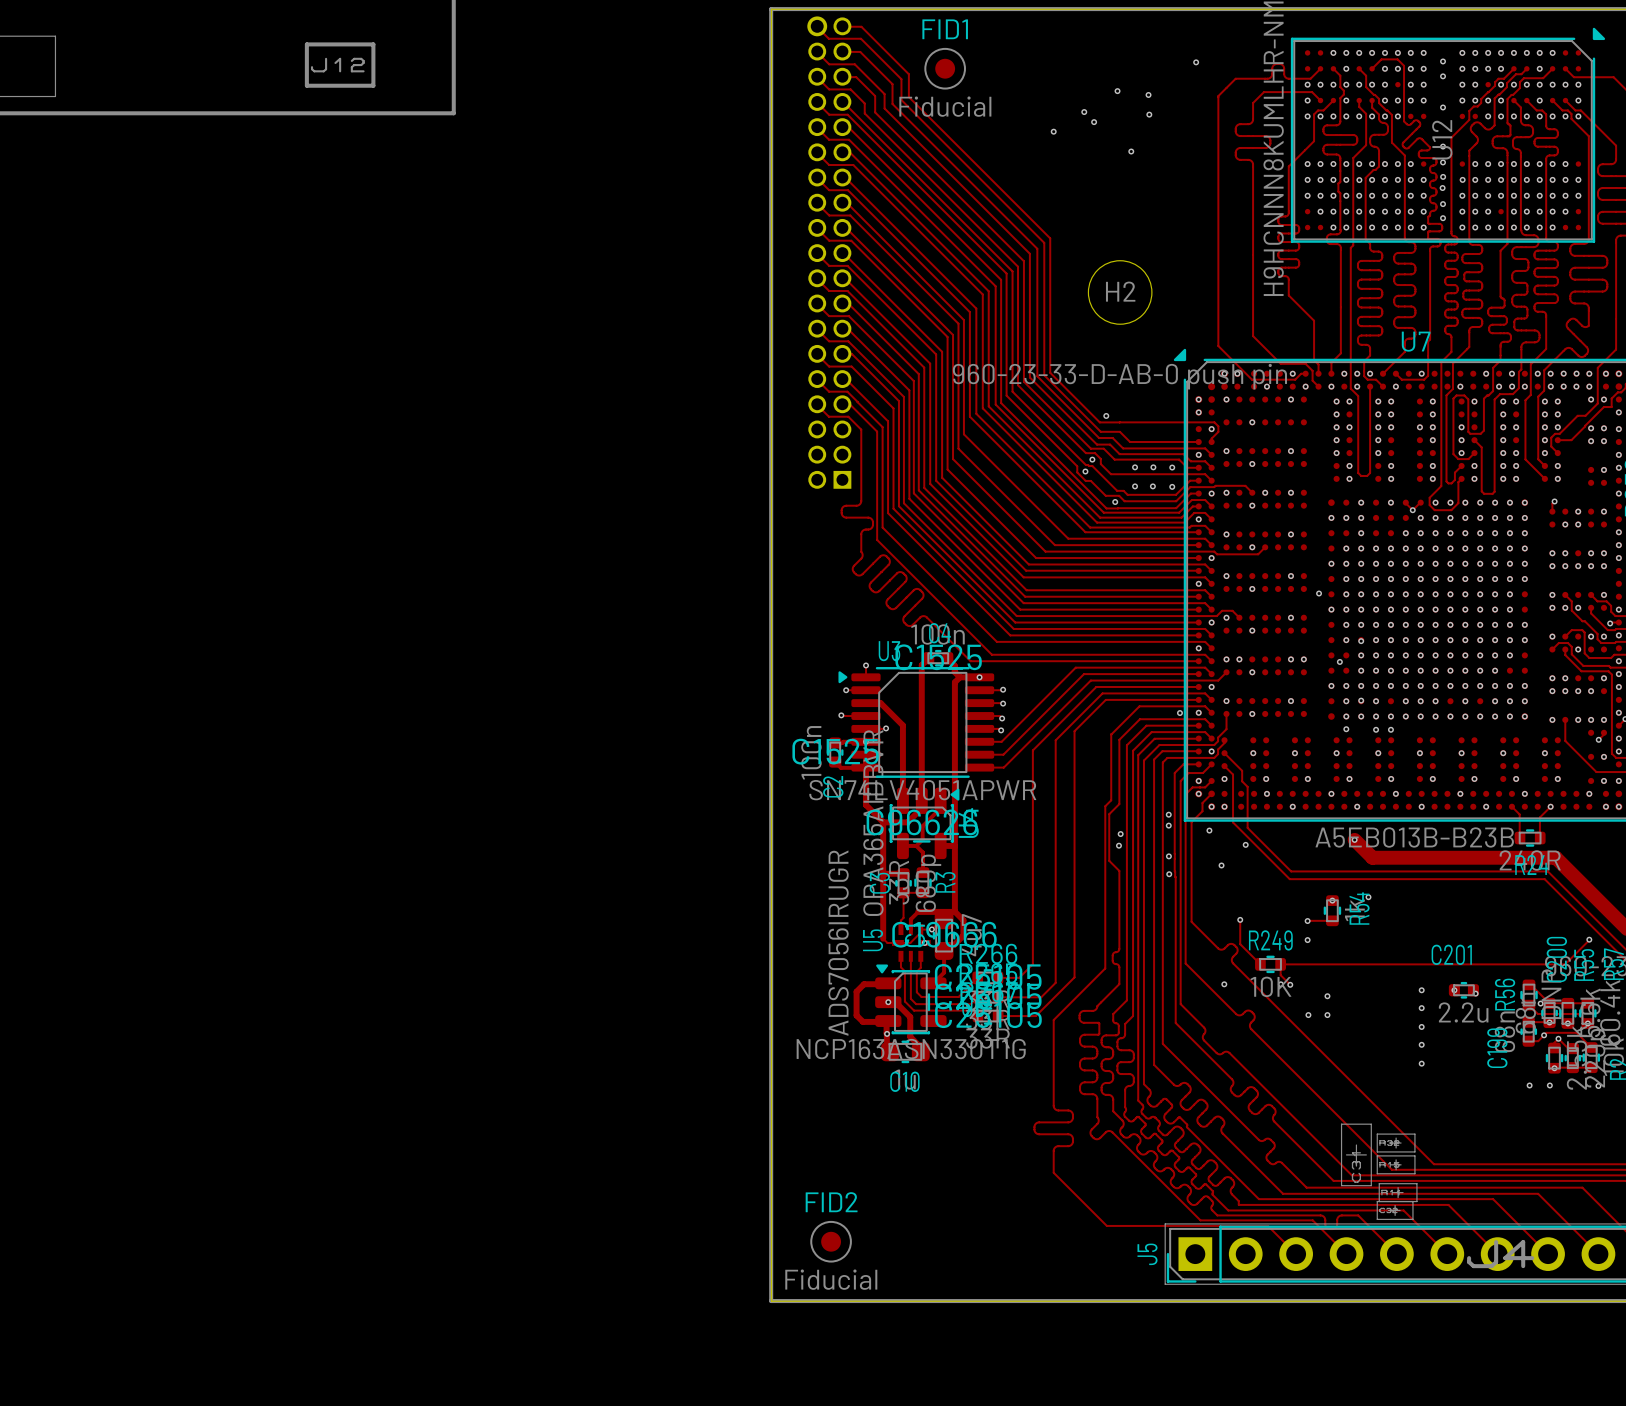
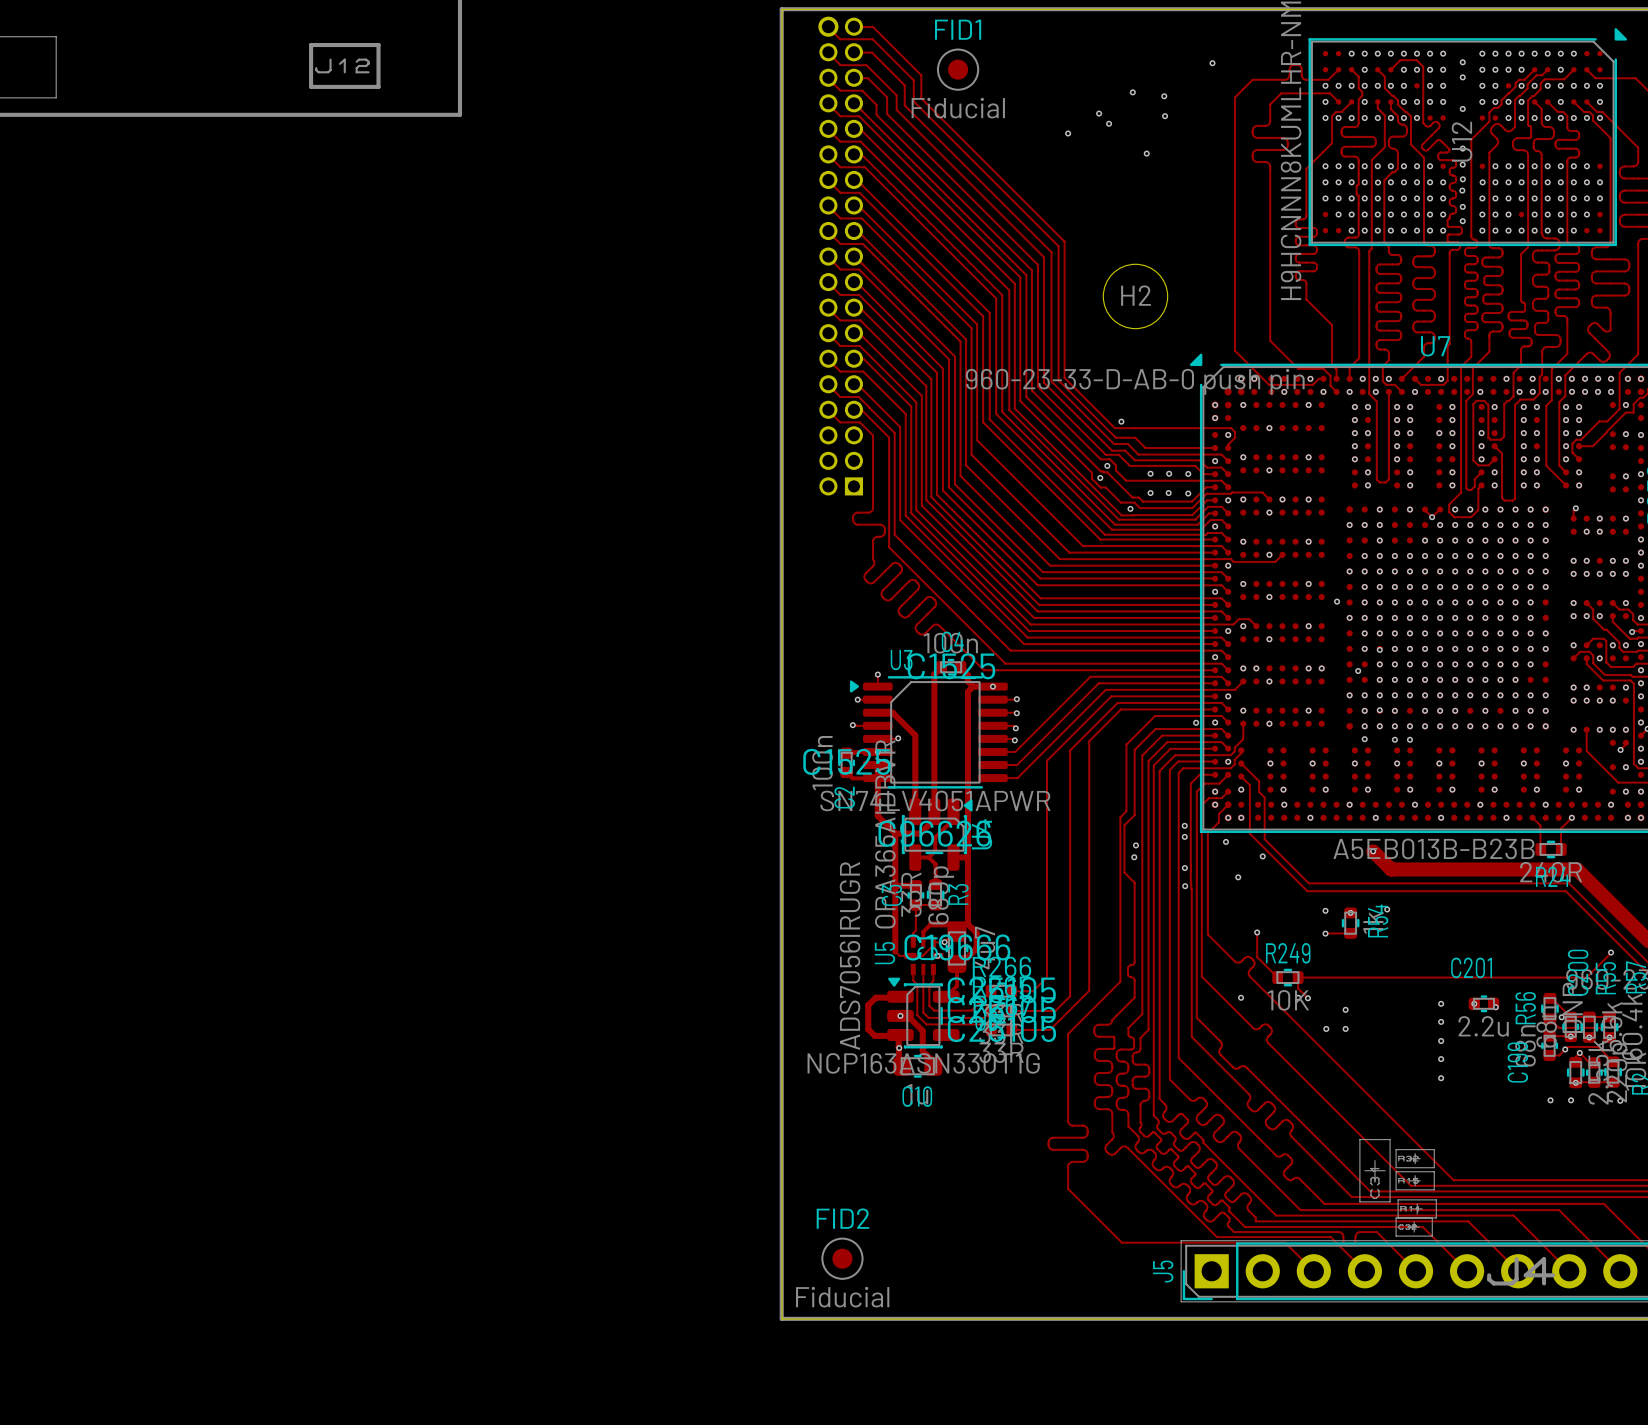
via: (1591, 399) -> none
via: (1618, 412) -> none
via: (1591, 428) -> none
via: (1591, 441) -> none
via: (1603, 441) -> none
via: (1618, 454) -> none
via position: (1307, 940) -> (1325, 910)

